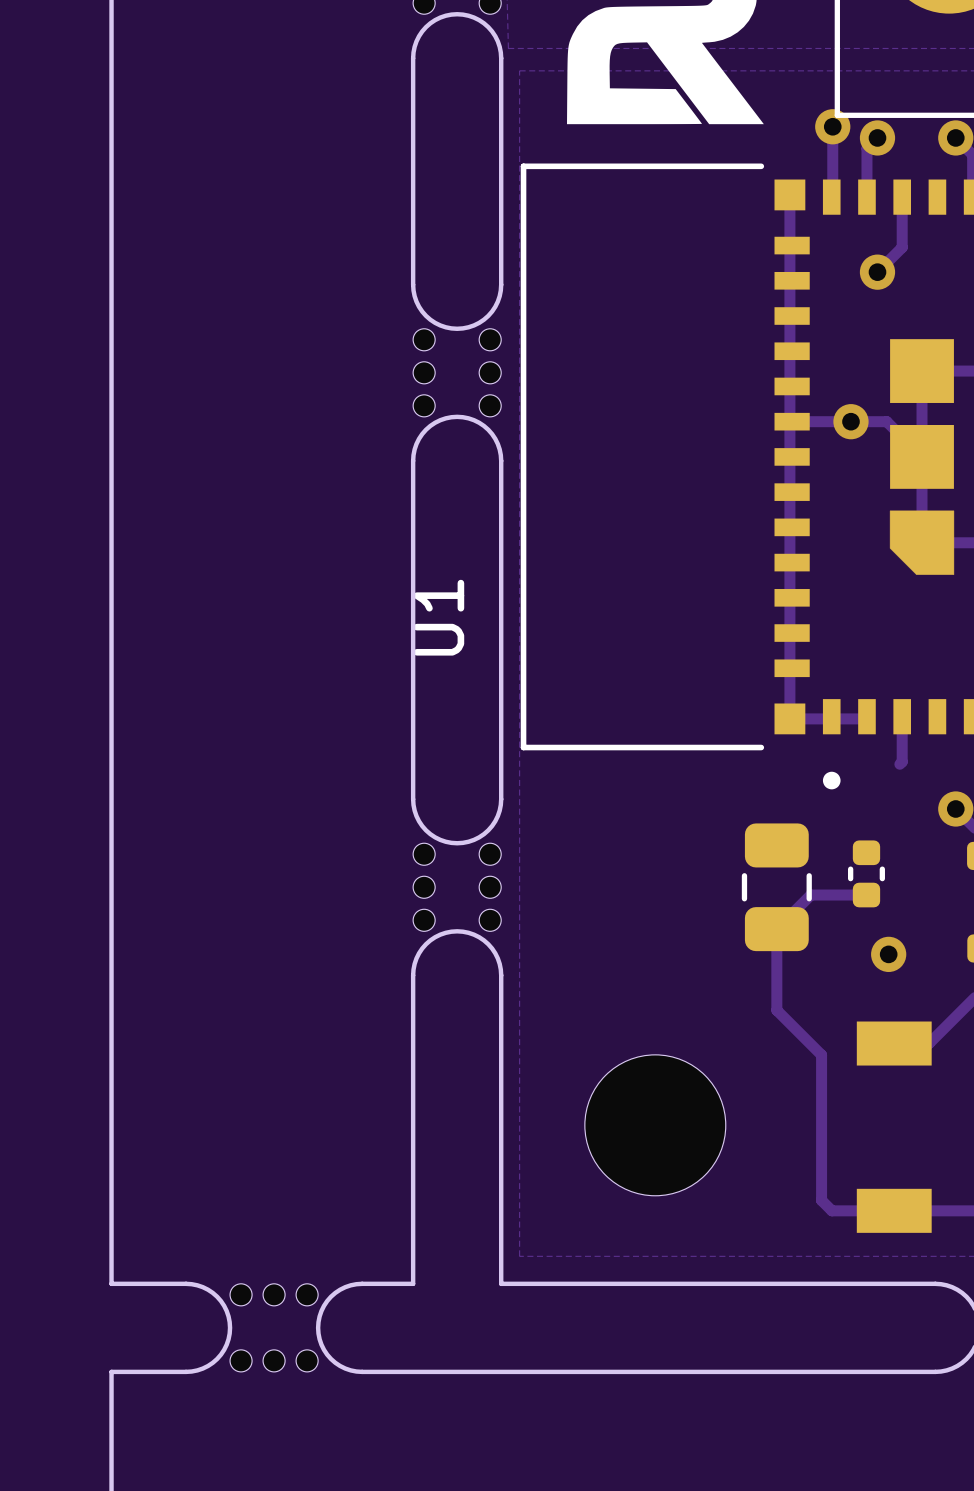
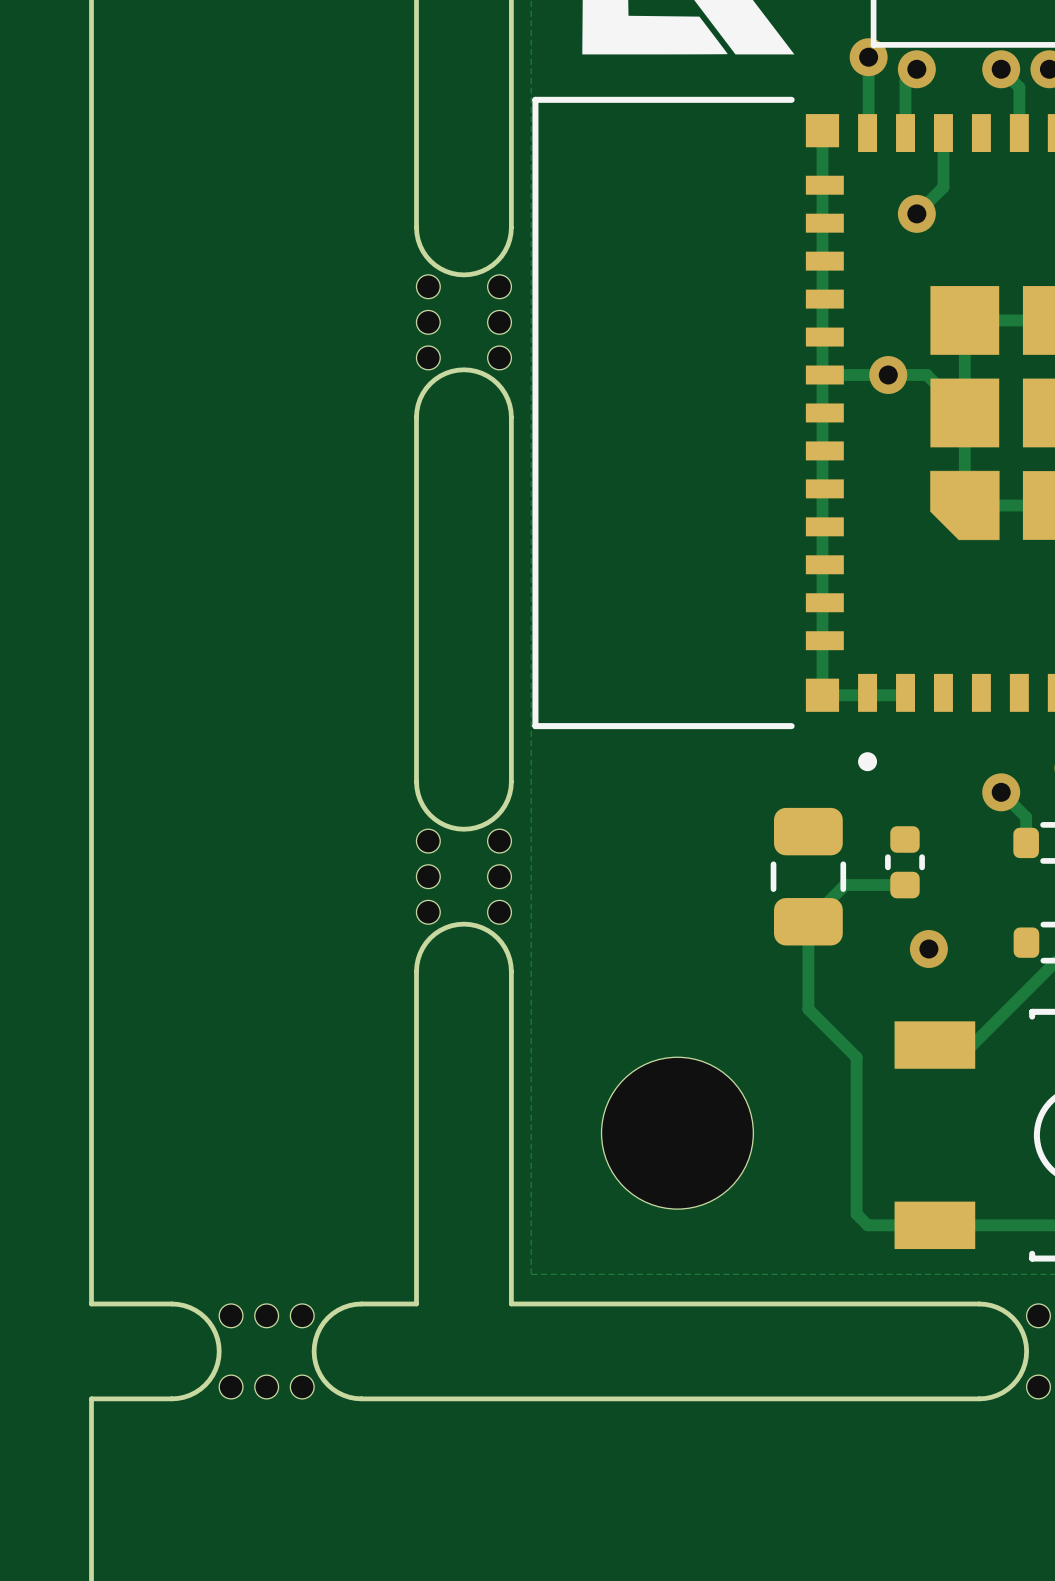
U1 name: U1 (438, 617) -> none
track: (902, 716) (902, 761) (899, 764) -> none

